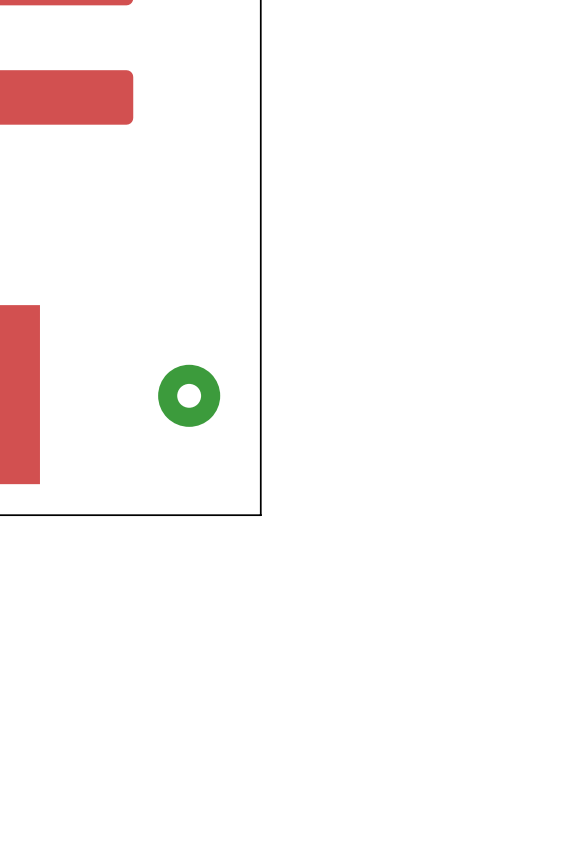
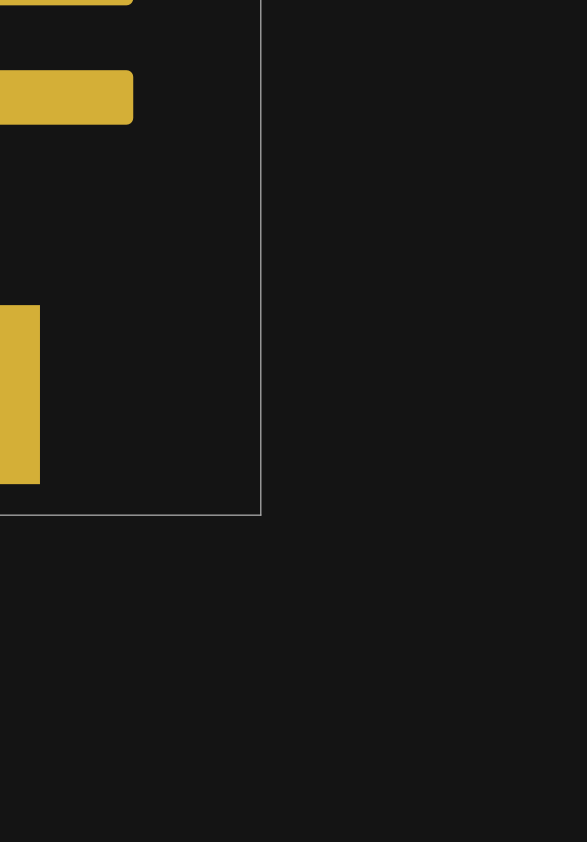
via: (189, 395) -> none

